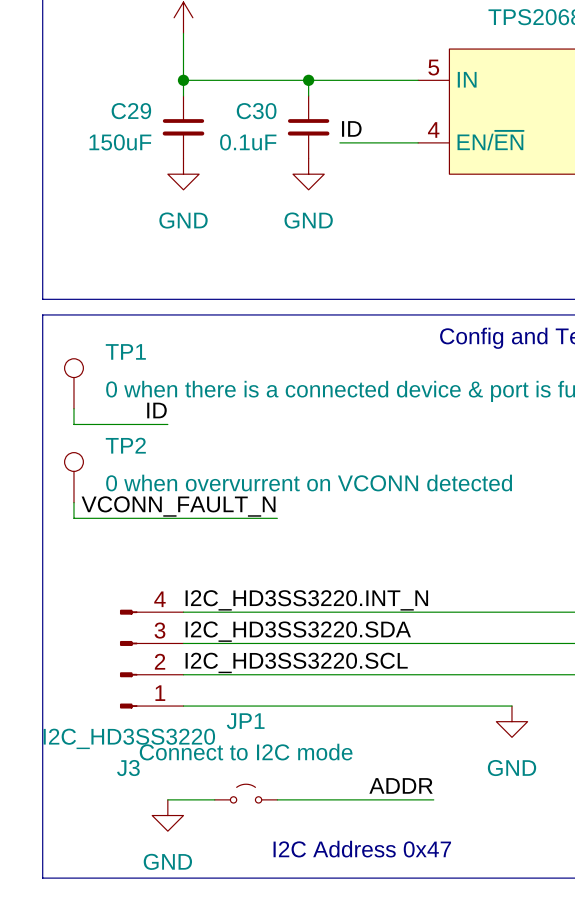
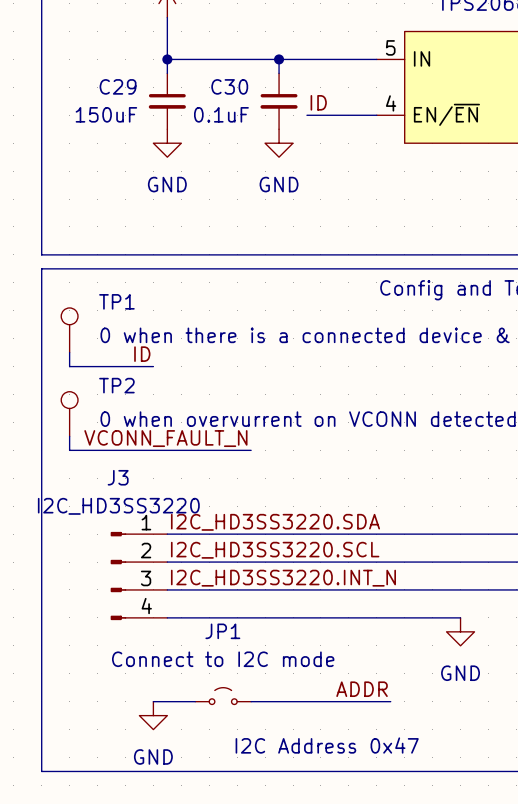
label: I2C_HD3SS3220.INT_N (306, 600) -> I2C_HD3SS3220.SDA (275, 522)
label: I2C_HD3SS3220.SDA (298, 631) -> I2C_HD3SS3220.SCL (275, 550)
J3 flip: as is (128, 659) -> up-down (118, 576)
label: I2C_HD3SS3220.SCL (296, 662) -> I2C_HD3SS3220.INT_N (283, 578)

